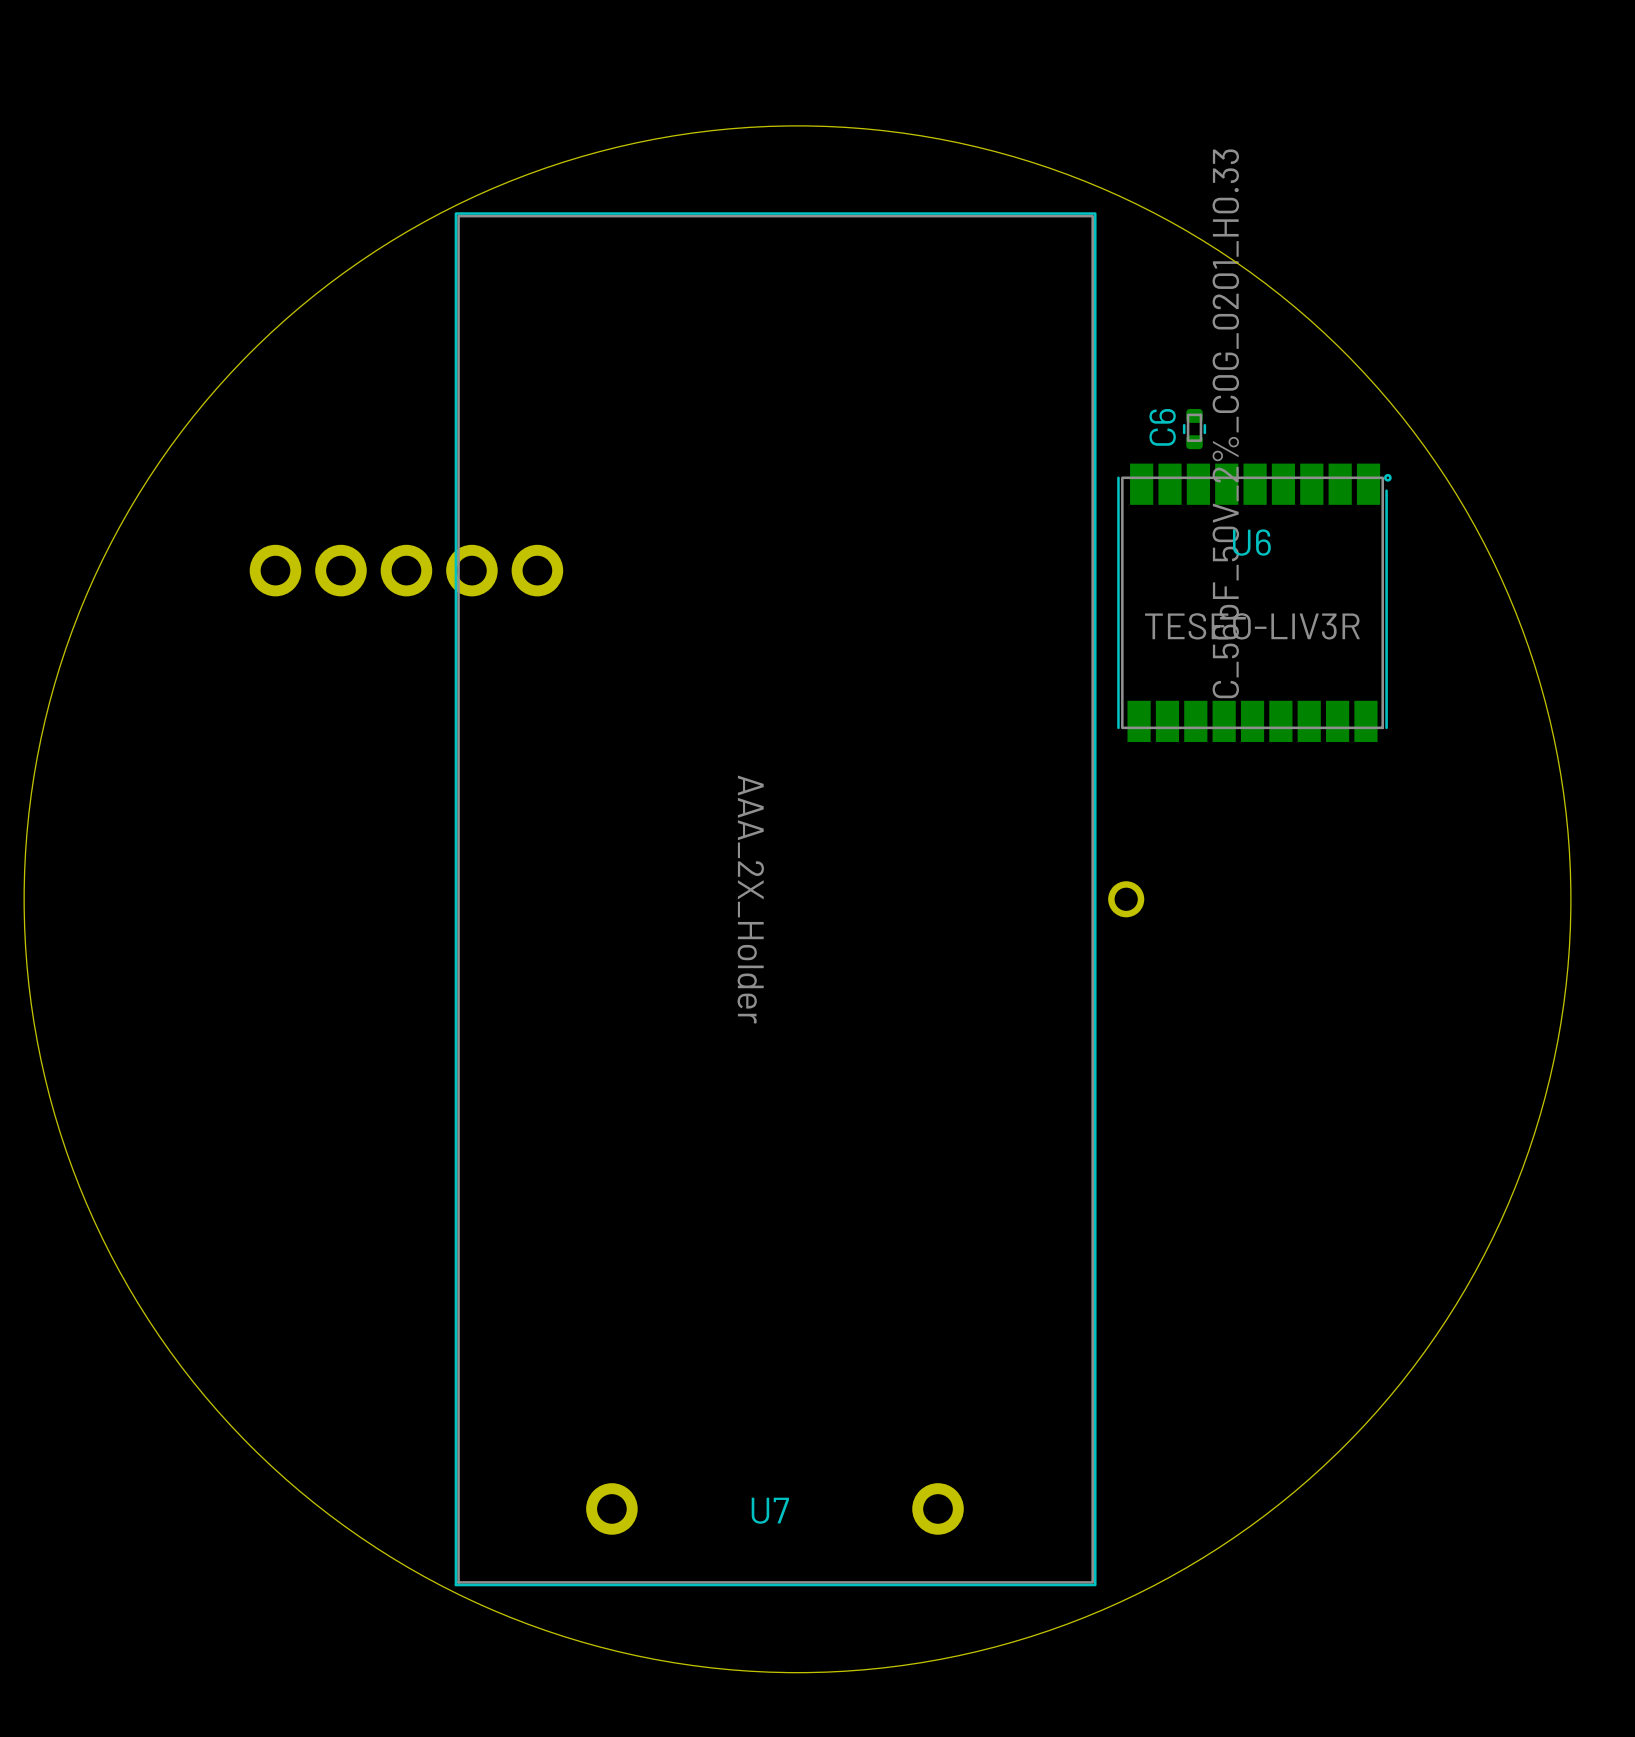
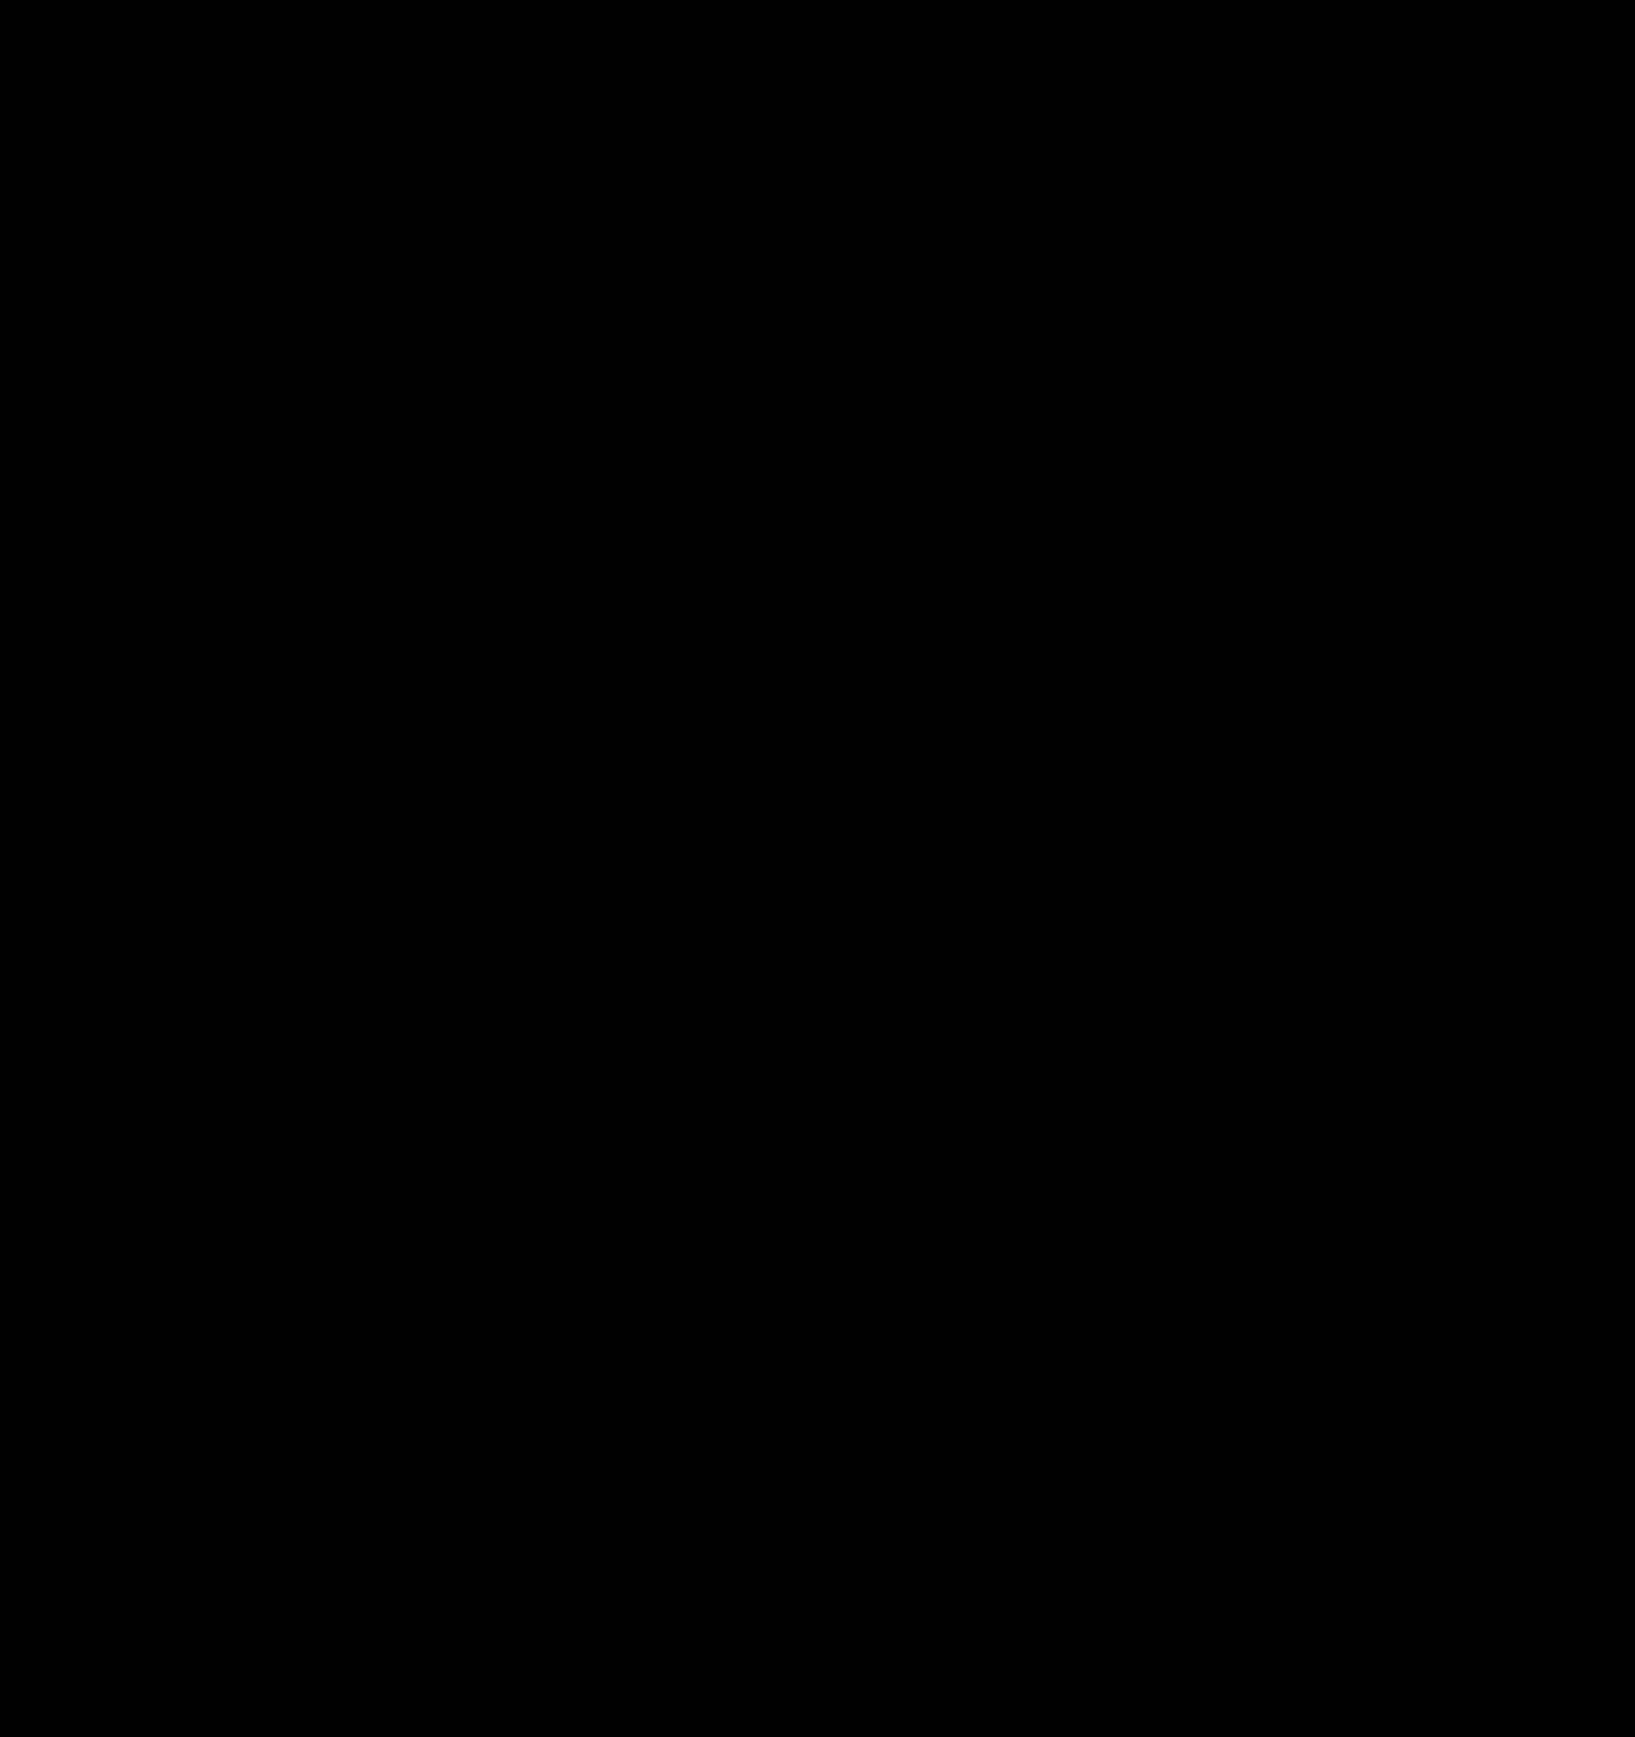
round board edge: [23, 125, 1572, 1674] -> none
C6: C_56pF_50V_2%_C0G_0201_H0.33 (1194, 429) -> none
part: (406, 570) -> none
U6: TESEO-LIV3R (1254, 602) -> none
U7: AAA_2X_Holder (775, 899) -> none
part: (1126, 899) -> none

